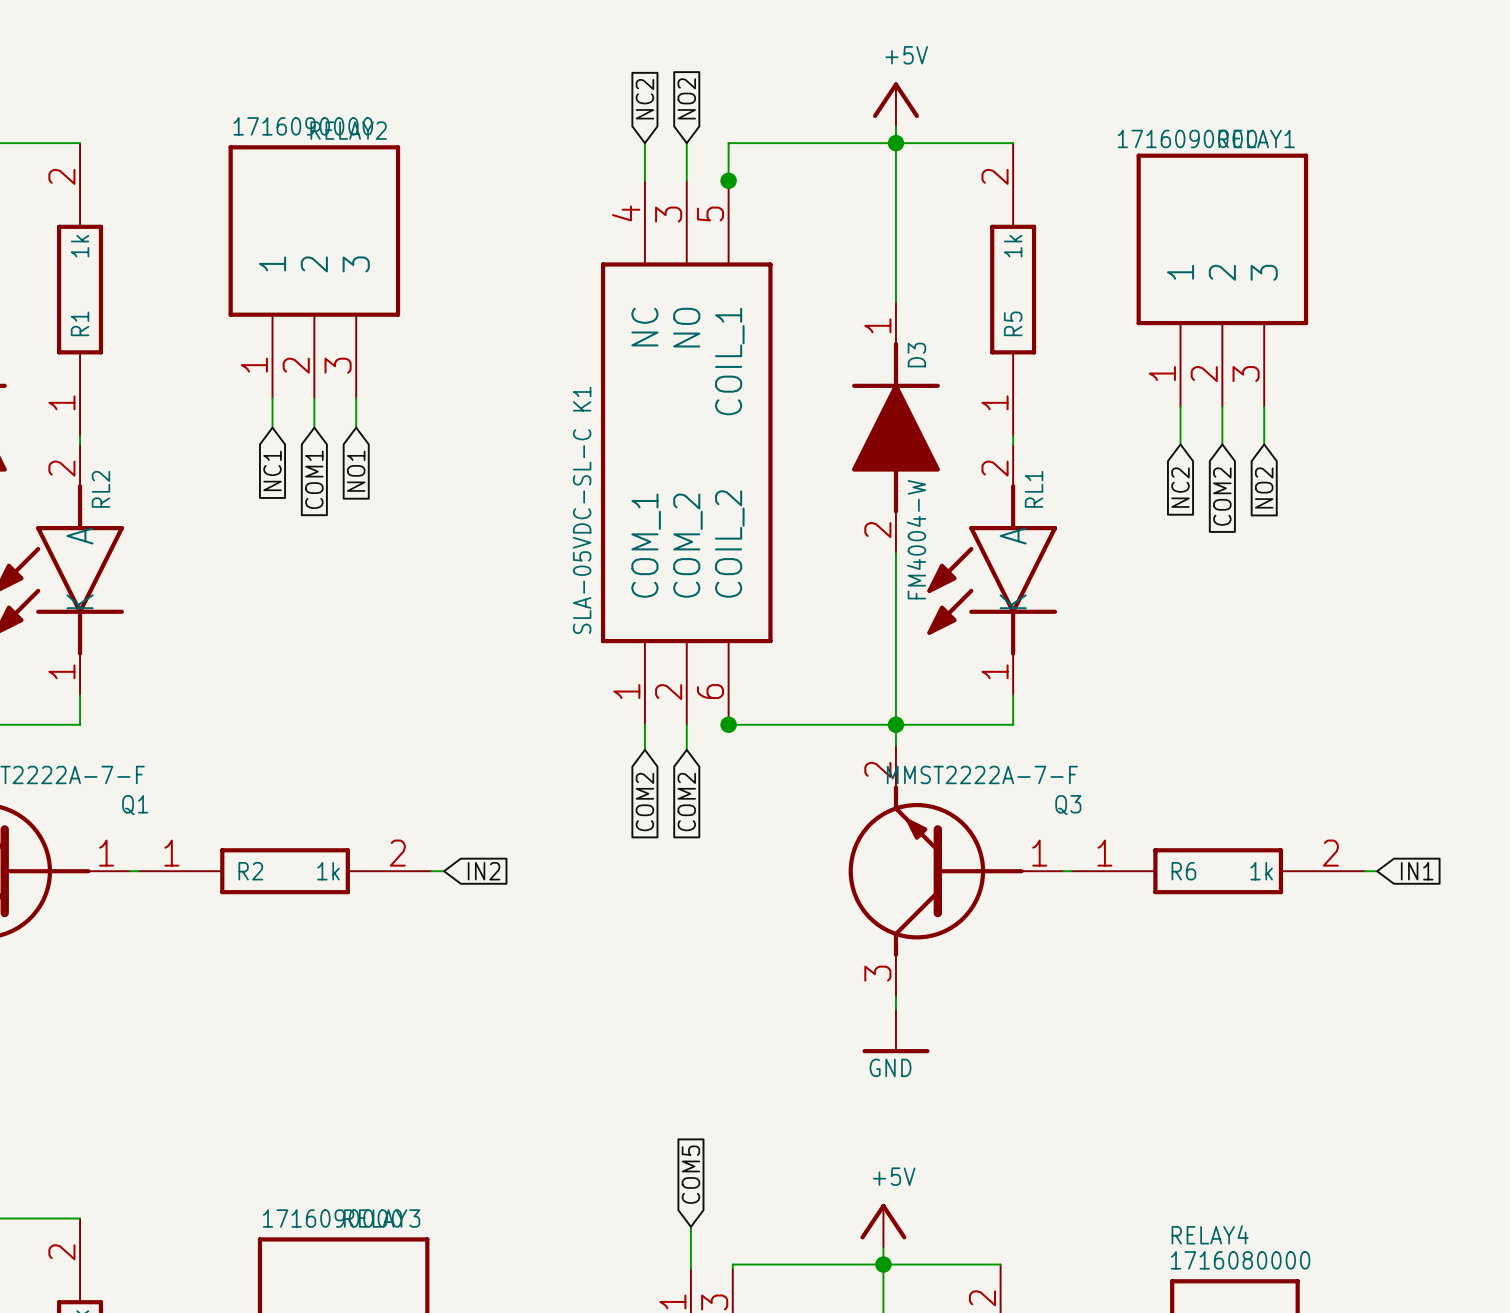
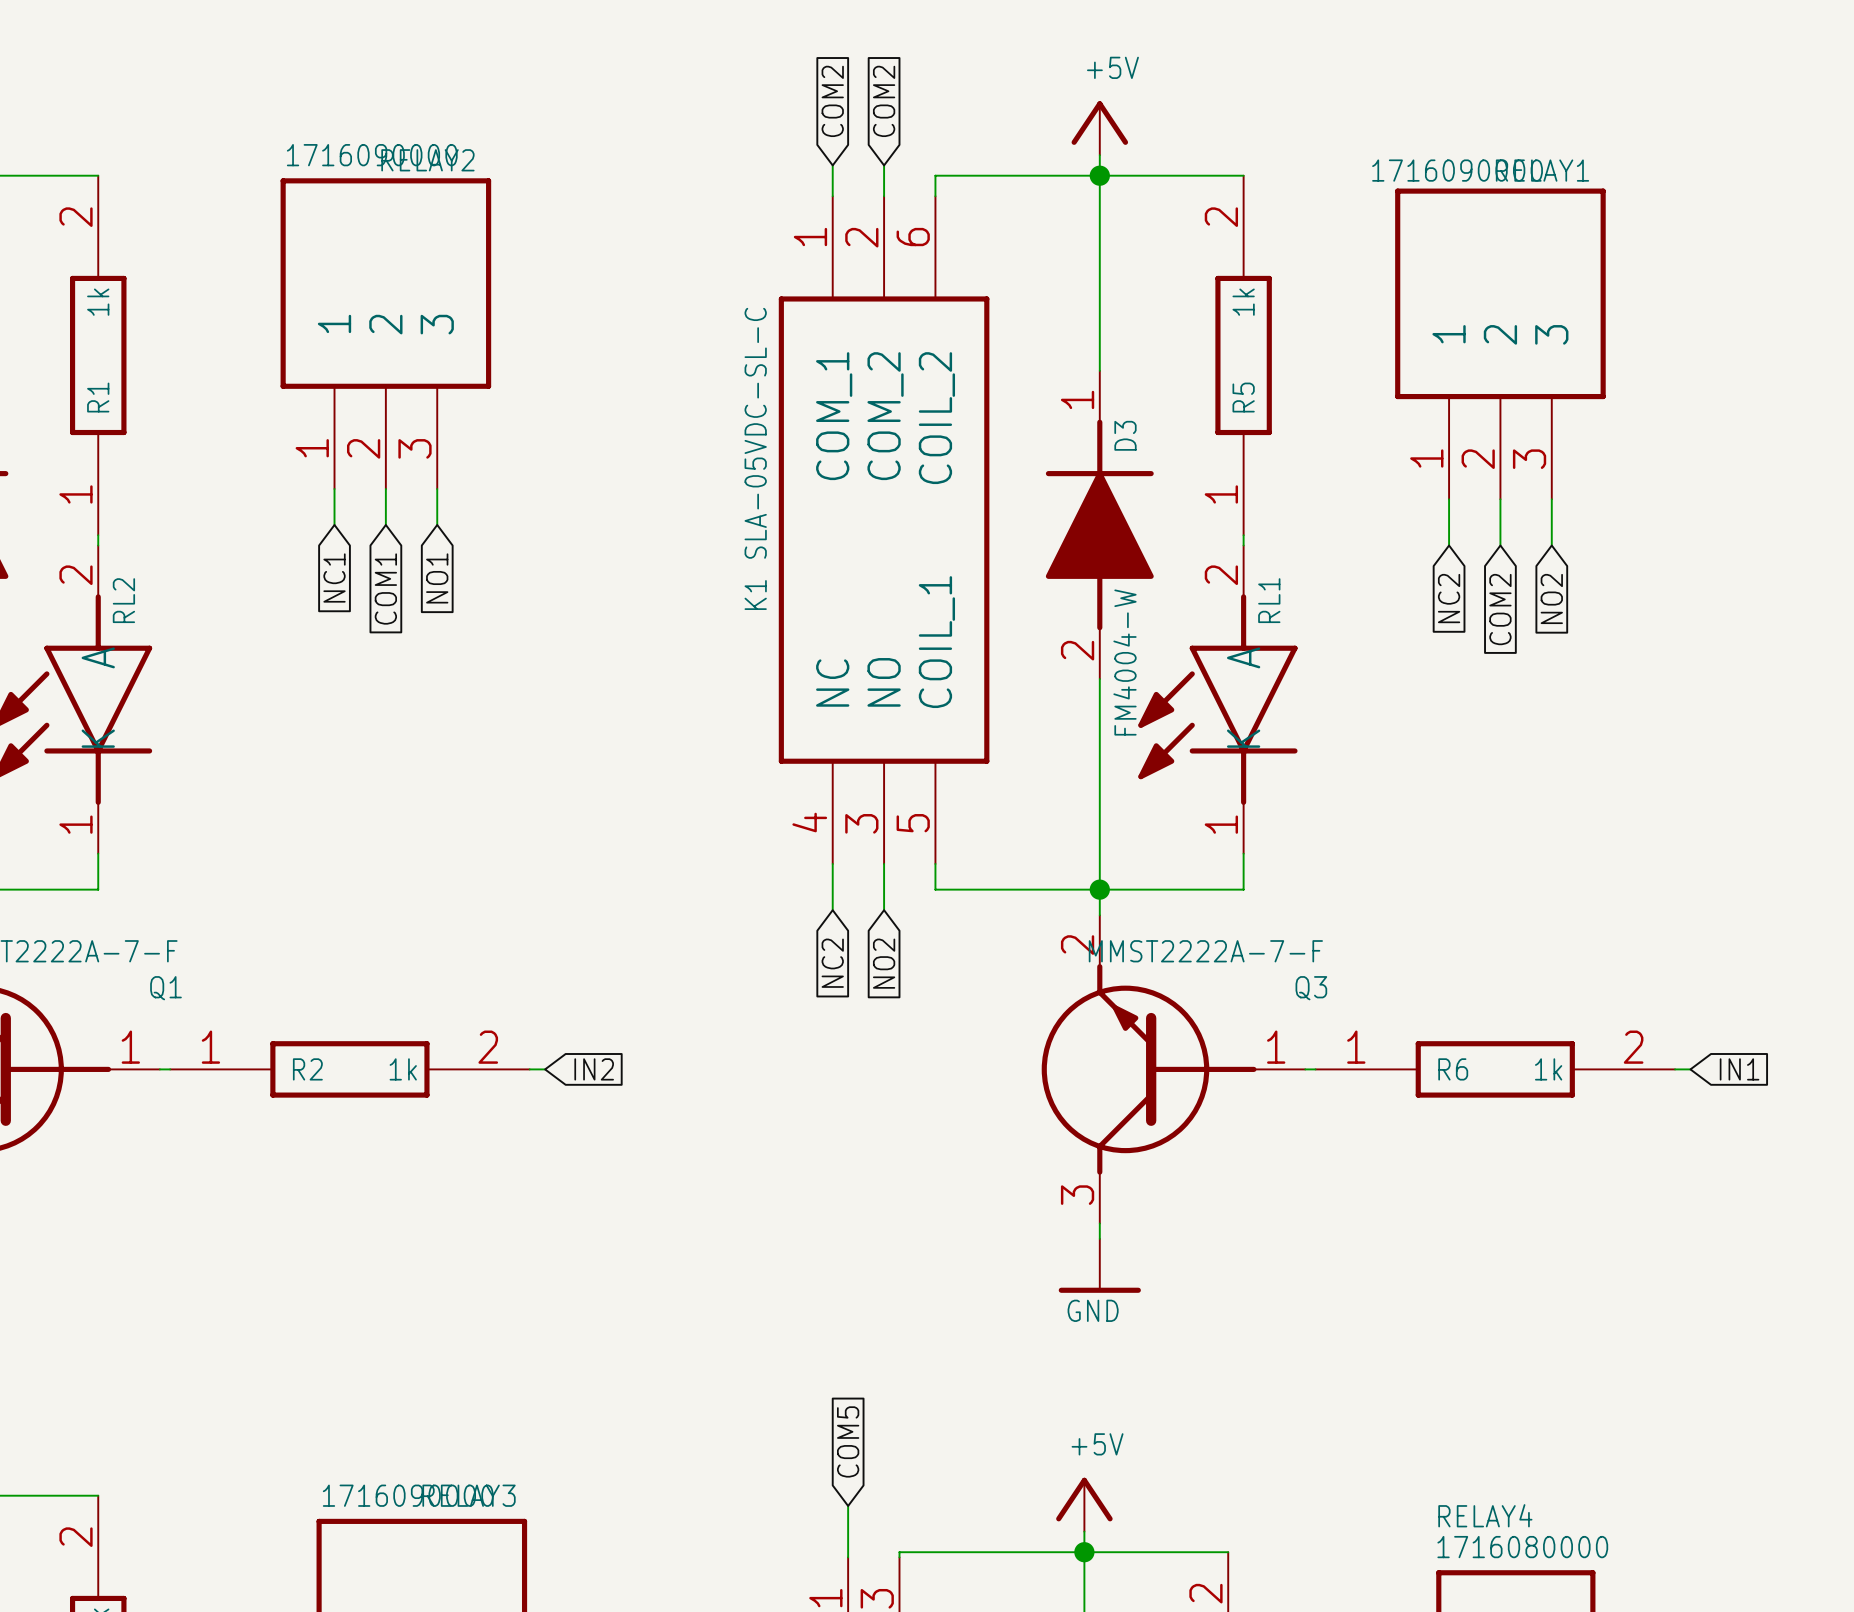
global label: none -> COM2 (884, 101)
global label: NO2 (686, 98) -> COM2 (832, 101)
global label: NC2 (644, 99) -> none
wire: none -> (832, 165) (832, 196)
wire: none -> (884, 165) (884, 196)
wire: (644, 143) (644, 180) -> none
wire: (686, 143) (686, 180) -> none
wire: (762, 143) (728, 143) (728, 180) -> (935, 175) (935, 196)
junction: (728, 180) -> none
K1 flip: as is (686, 452) -> up-down (884, 530)
wire: none -> (832, 863) (832, 910)
wire: none -> (884, 863) (884, 910)
wire: (644, 724) (644, 749) -> none
wire: (686, 724) (686, 749) -> none
wire: (728, 724) (762, 724) -> (935, 863) (935, 889)
junction: (728, 724) -> none
global label: none -> NO2 (884, 963)
global label: COM2 (644, 802) -> none
global label: COM2 (686, 802) -> NC2 (832, 963)

